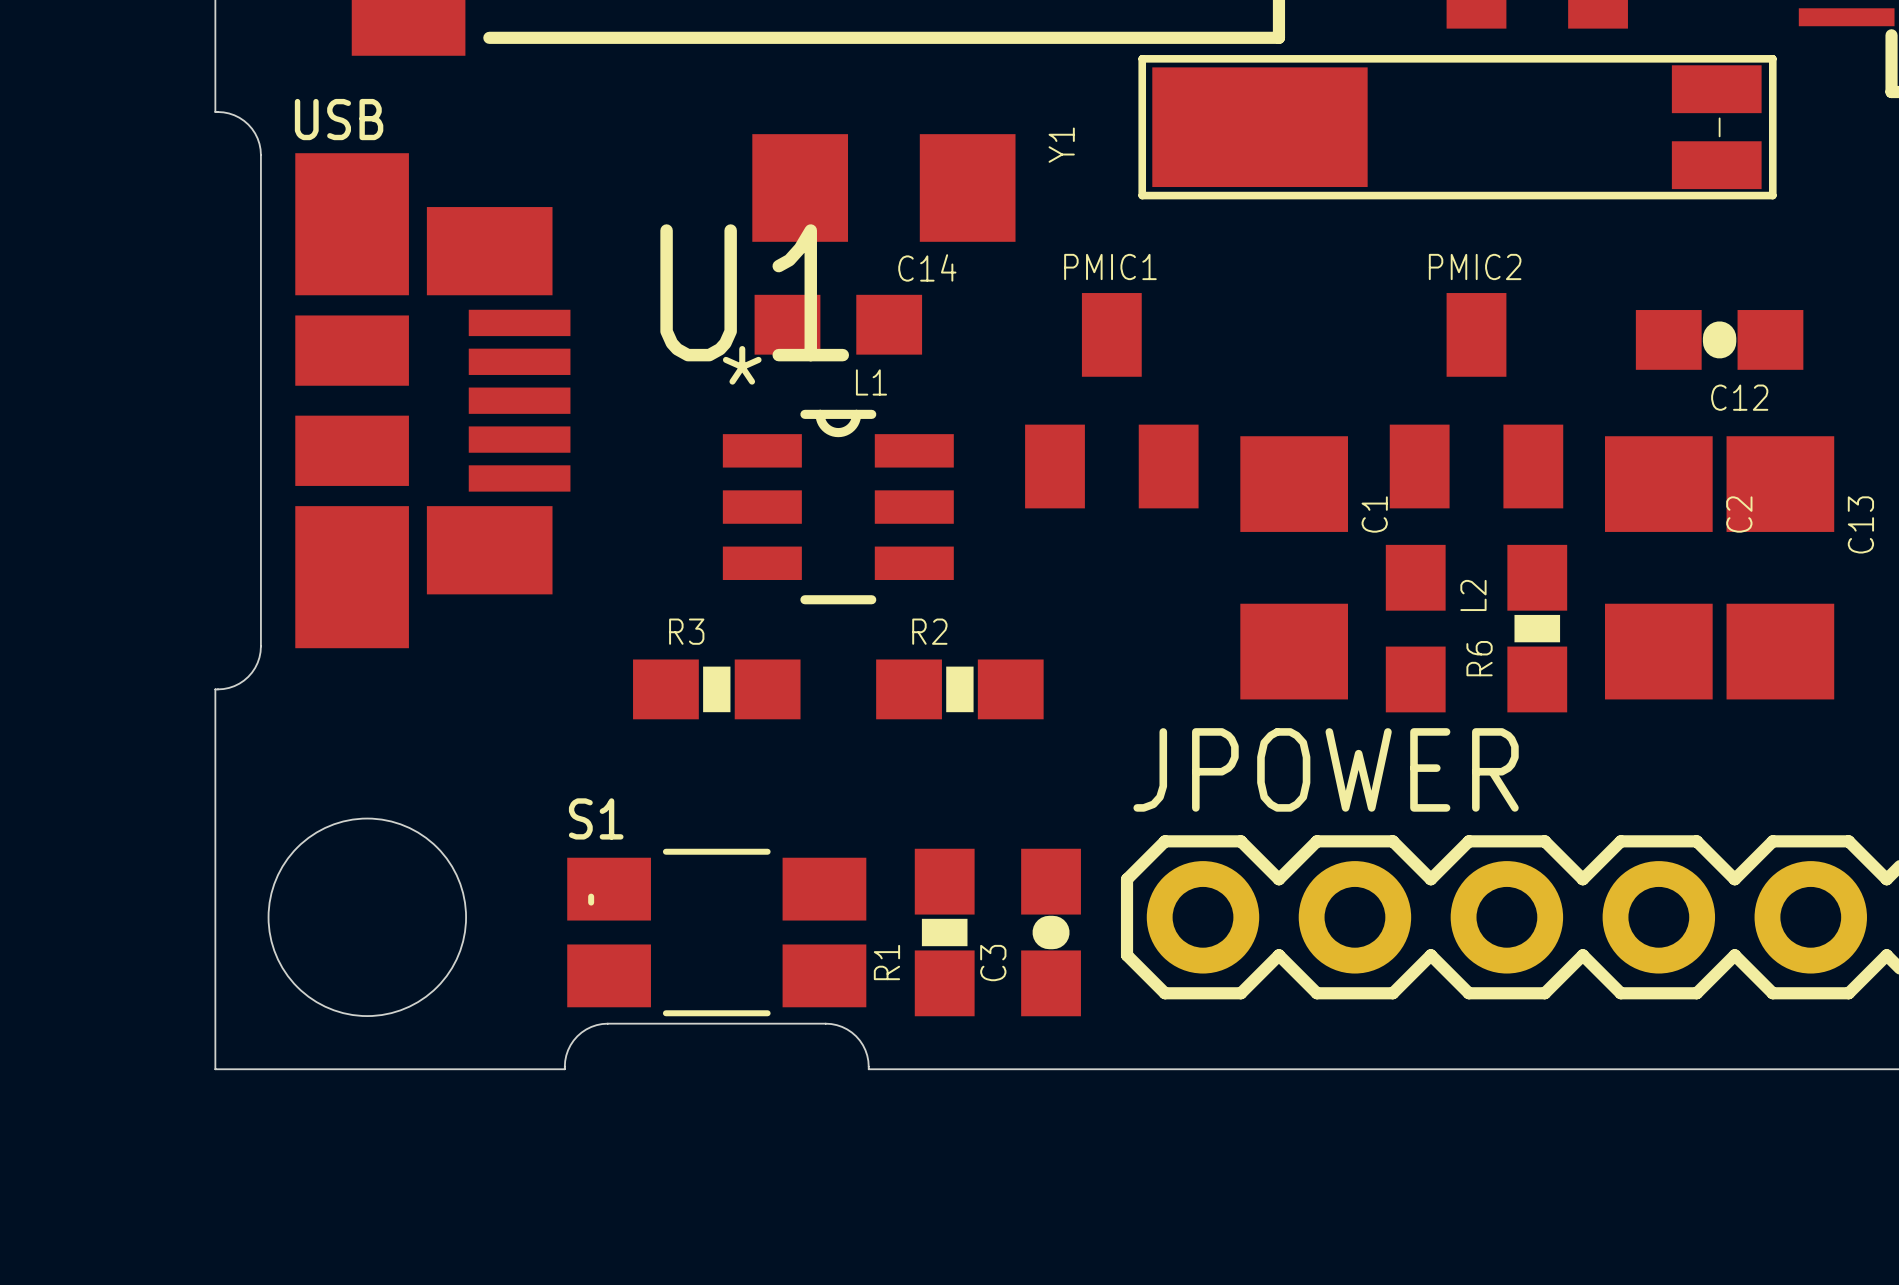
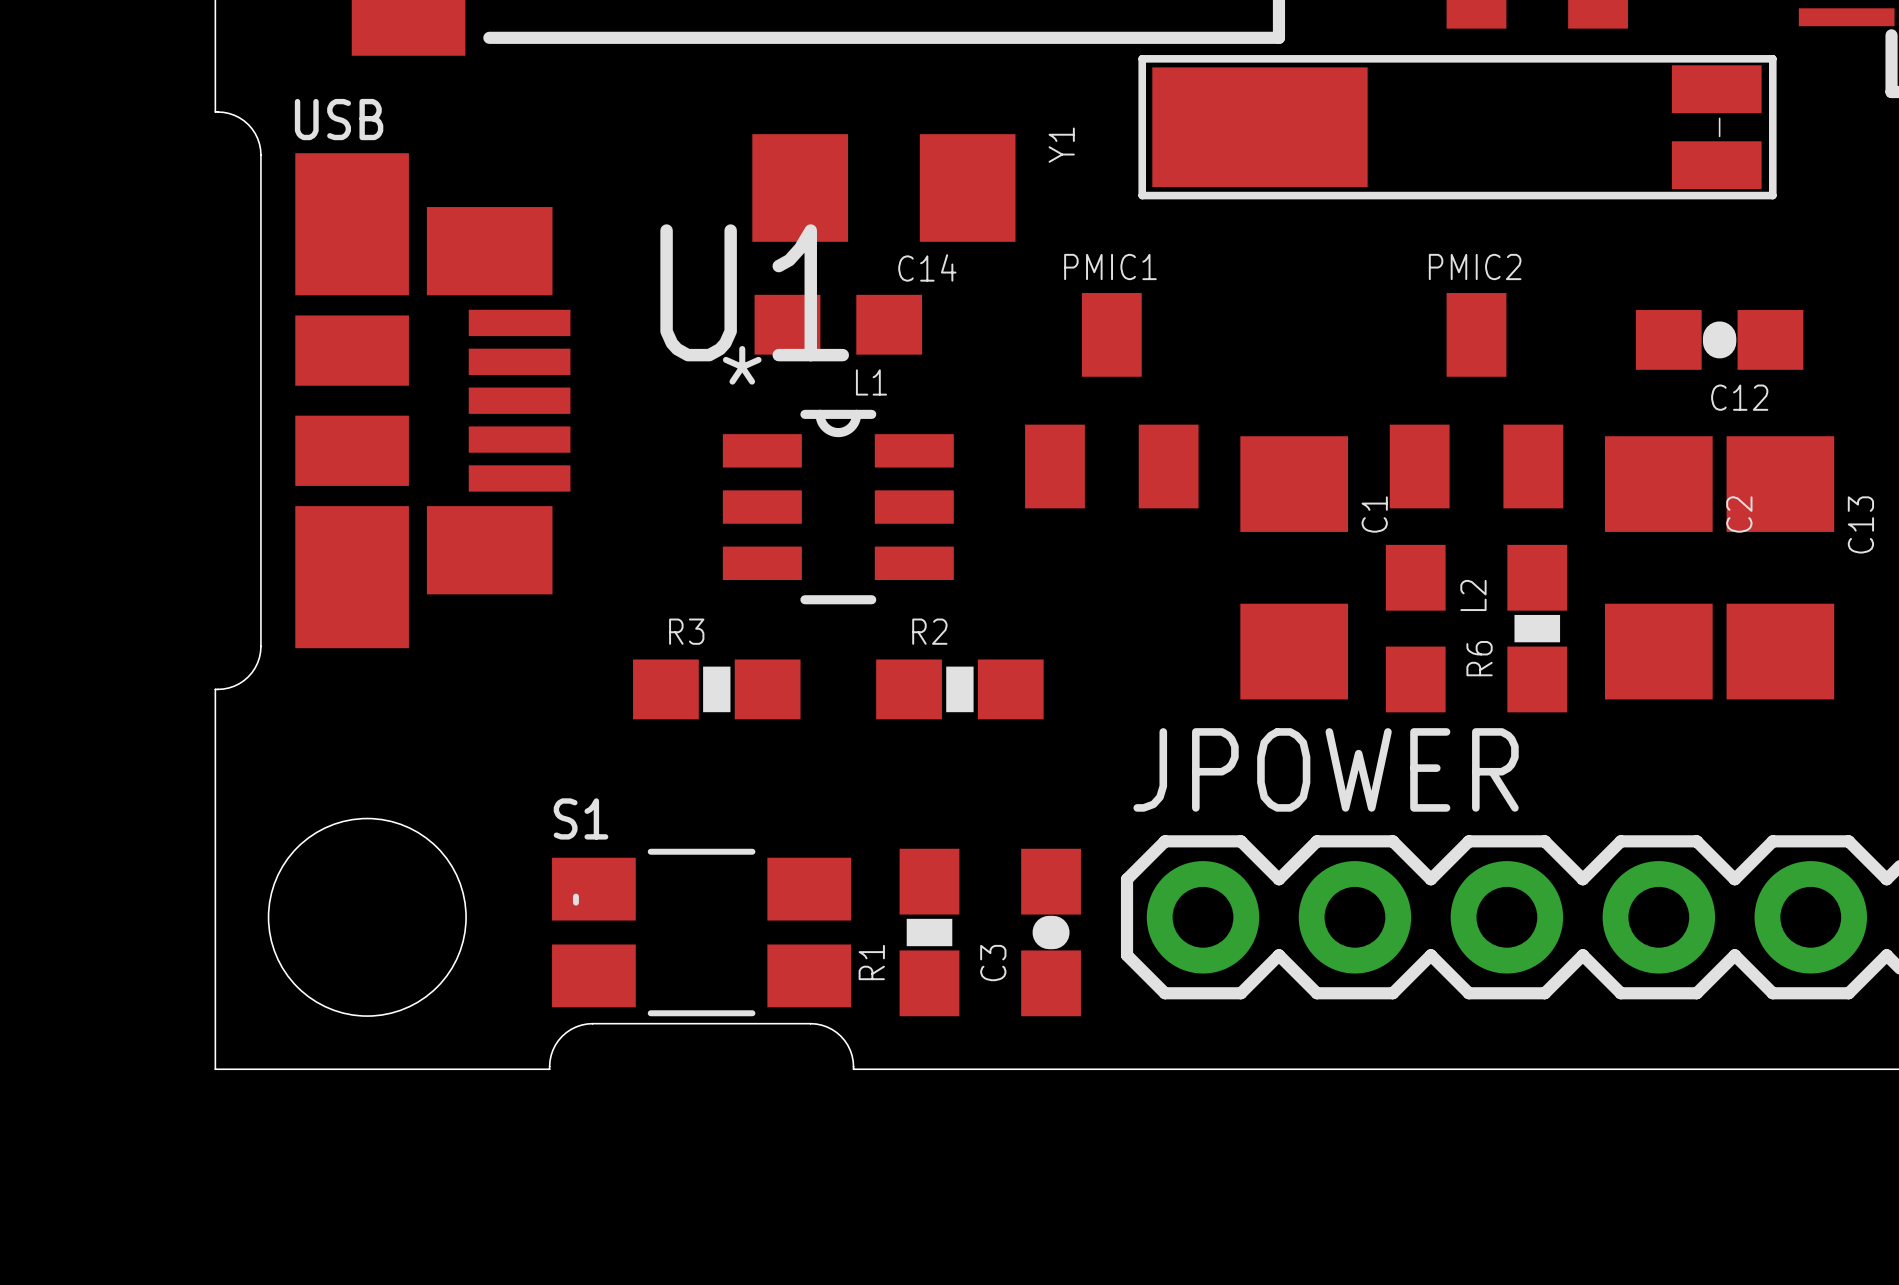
S1 position: (716, 932) -> (701, 932)
R1 position: (944, 932) -> (929, 932)
board edge: (607, 1023) (591, 1026) (577, 1036) (568, 1050) (564, 1069) (549, 1069) -> (607, 1023) (581, 1025) (566, 1032) (552, 1050) (549, 1069)
board edge: (810, 1023) (836, 1025) (851, 1032) (865, 1050) (868, 1069) -> (810, 1023) (826, 1026) (840, 1036) (850, 1050) (853, 1069) (868, 1069)

